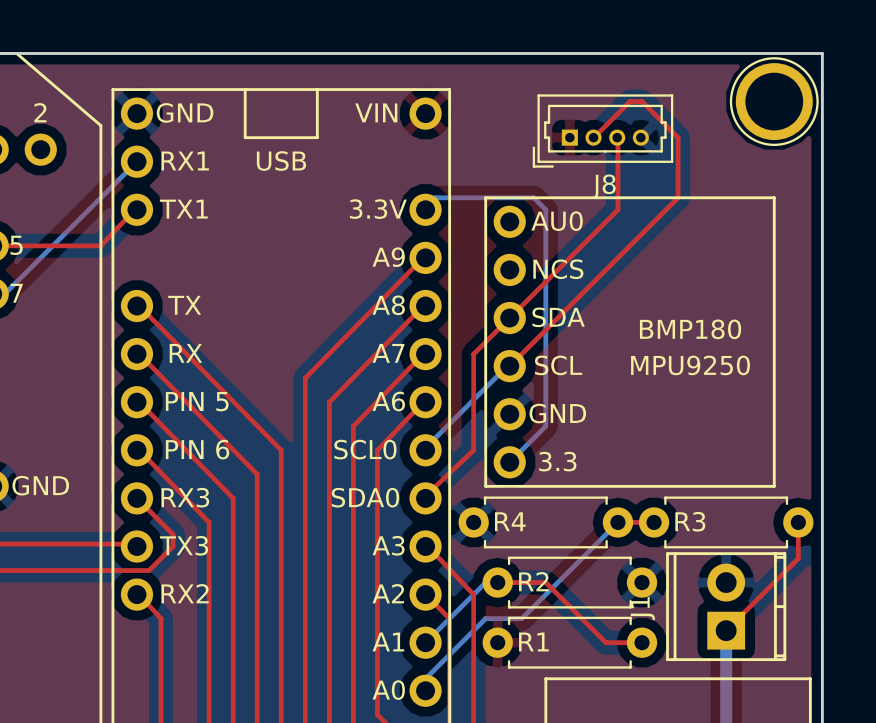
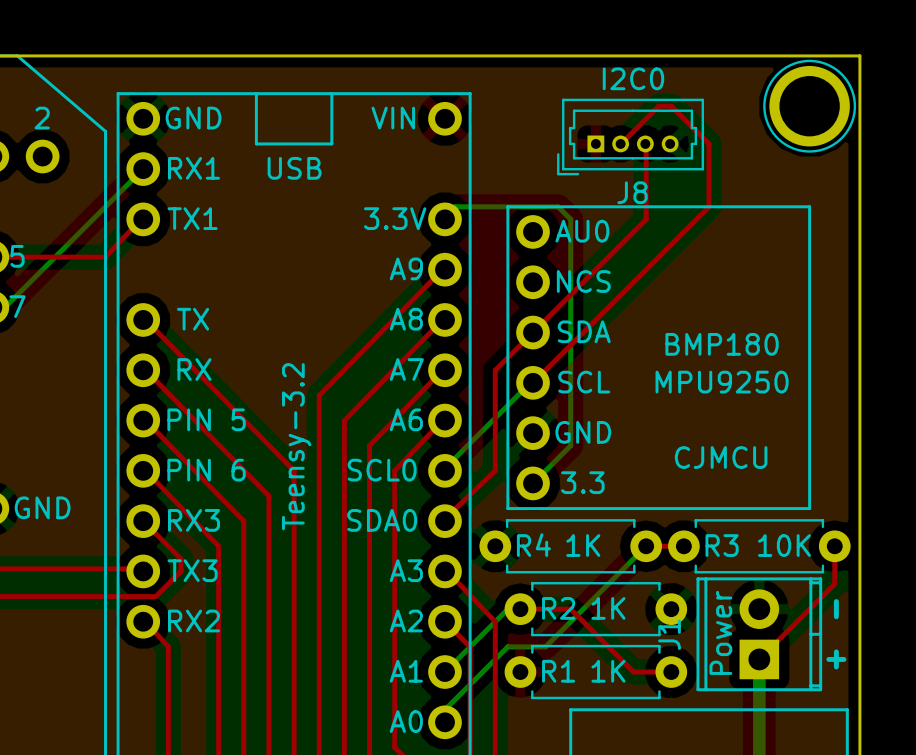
J8 value: none -> I2C0 (633, 78)
part value: none -> Teensy-3.2 (296, 446)
part value: none -> CJMCU (721, 457)
R2 value: none -> 1K (583, 545)
R3 value: none -> 10K (784, 545)
R4 value: none -> 1K (608, 608)
text: none -> - (836, 609)
J1 value: none -> Power (720, 632)
text: none -> + (836, 659)
R1 value: none -> 1K (608, 671)

